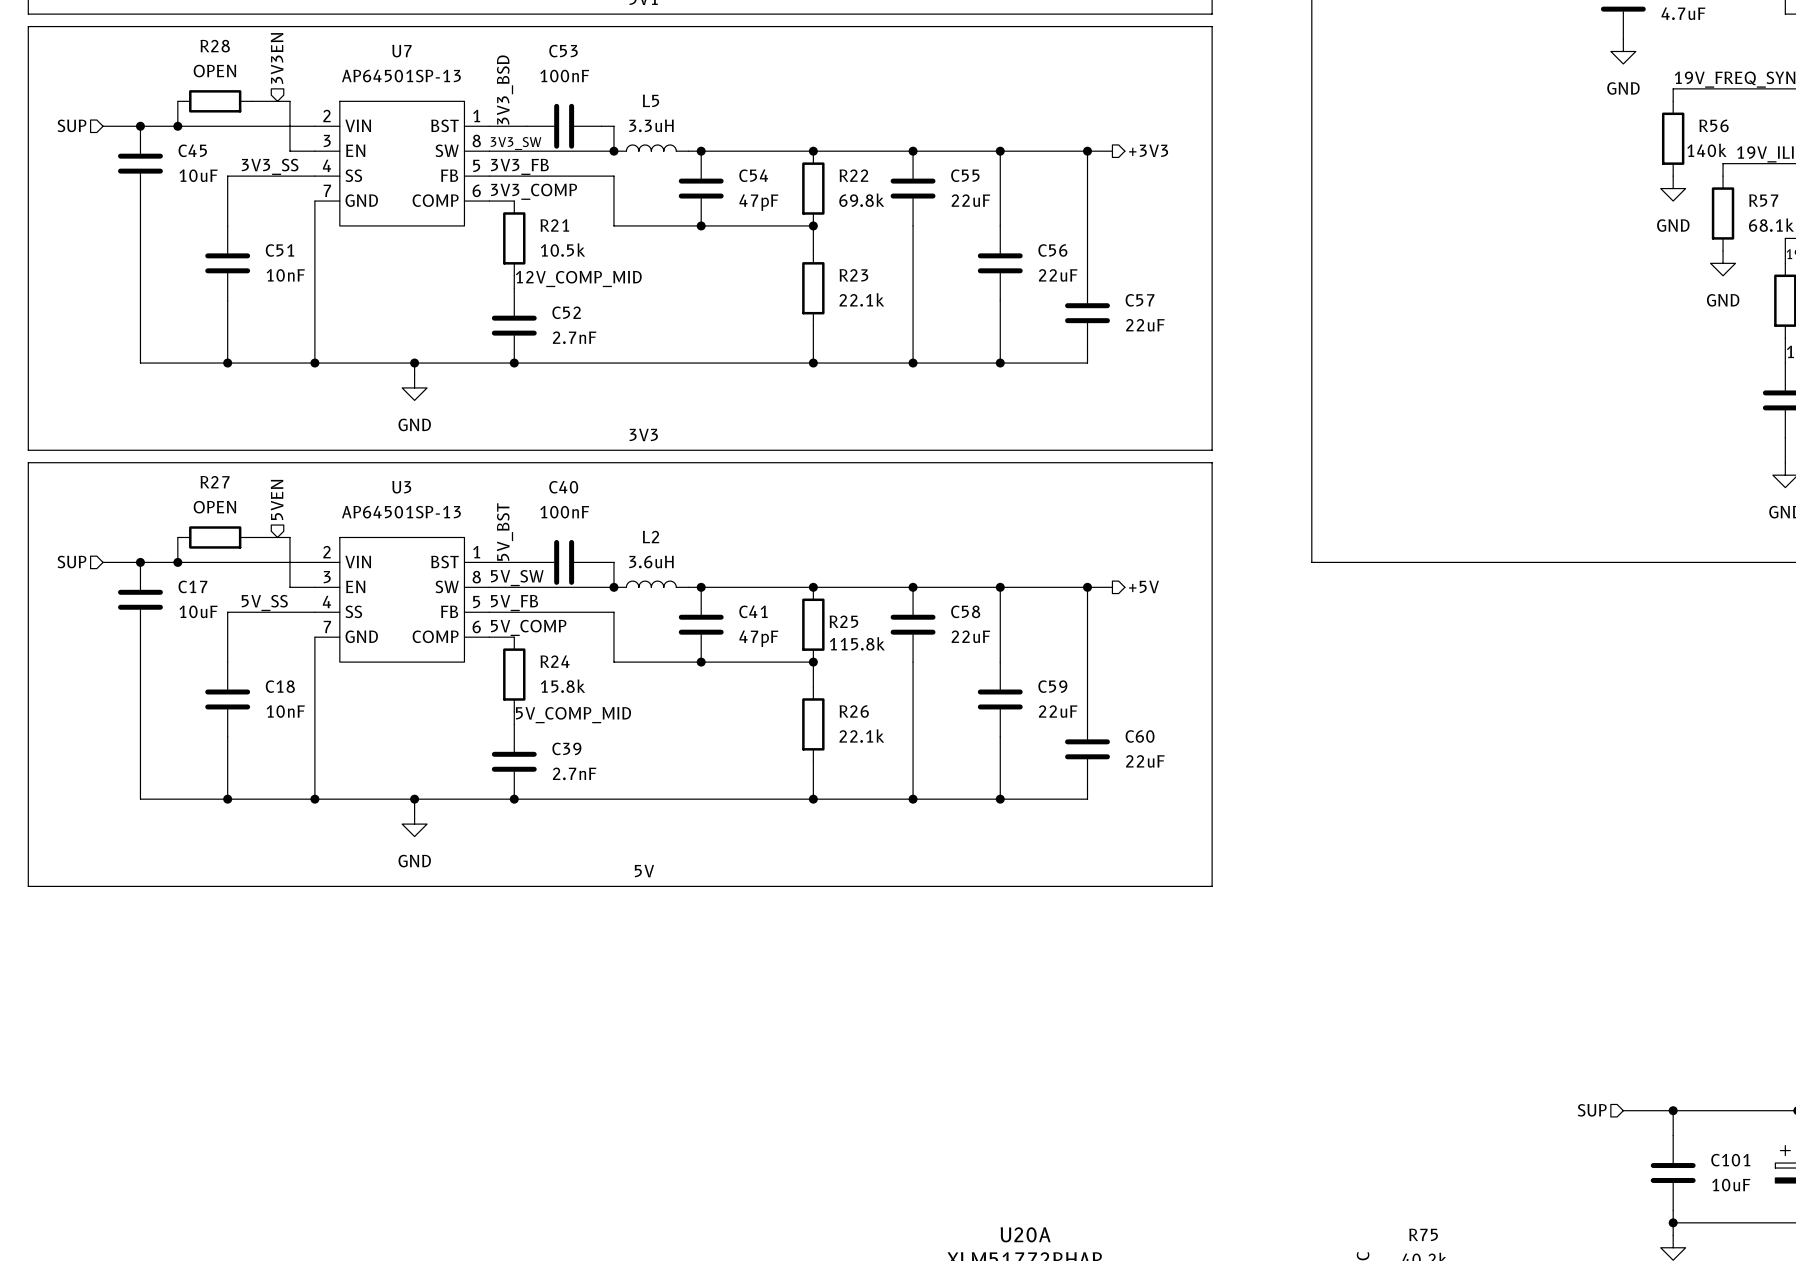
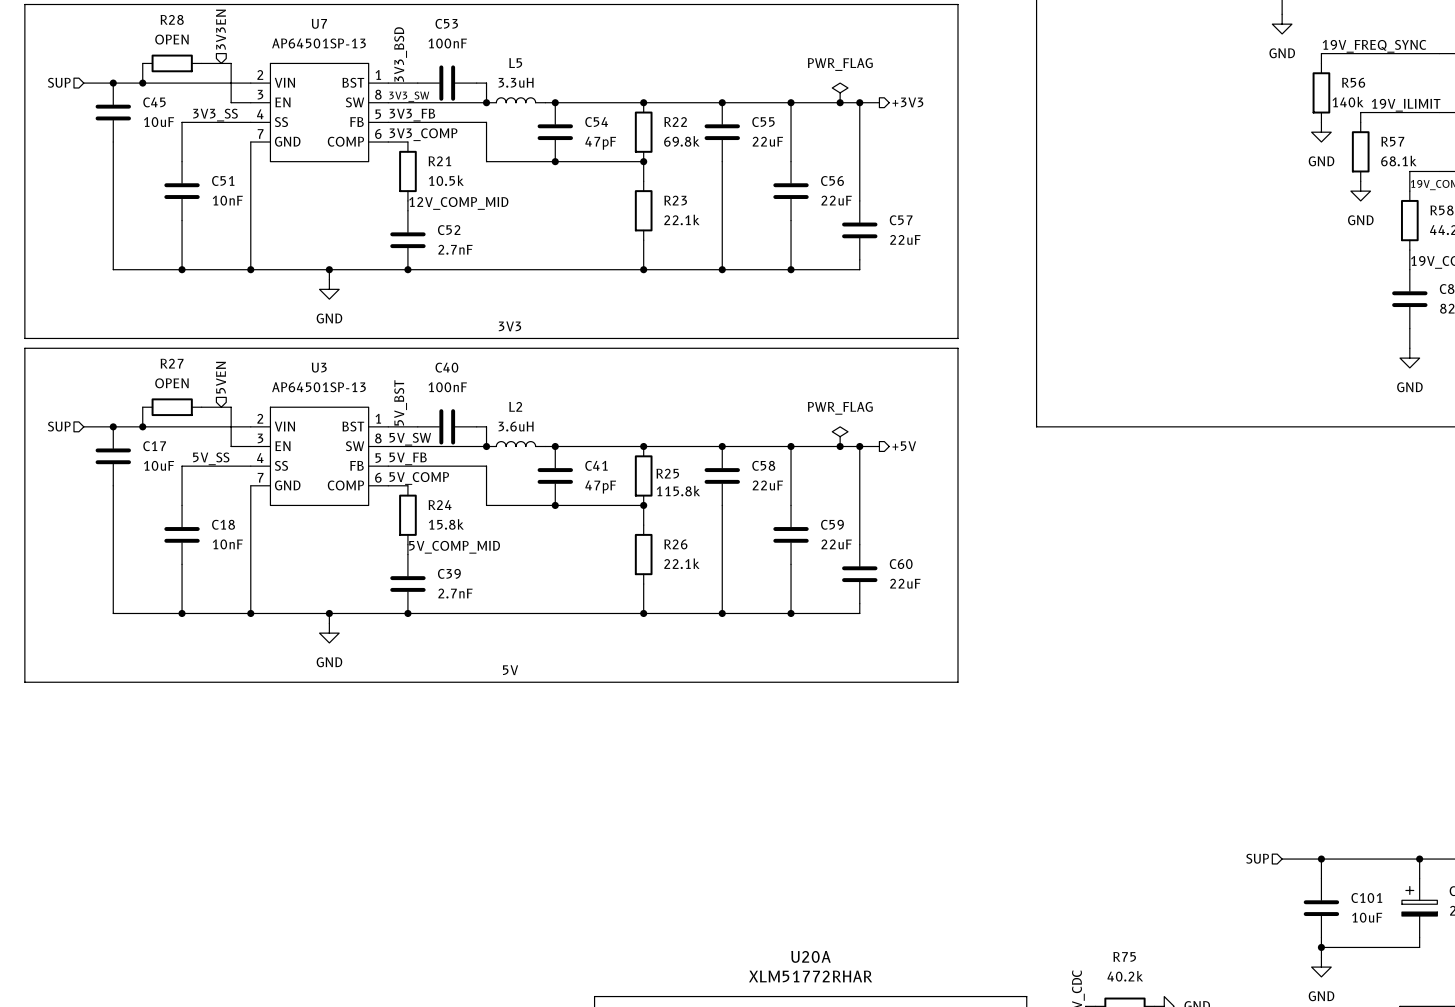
power symbol: none -> PWR_FLAG (840, 92)
junction: none -> (840, 102)
power symbol: none -> PWR_FLAG (840, 436)
junction: none -> (840, 446)

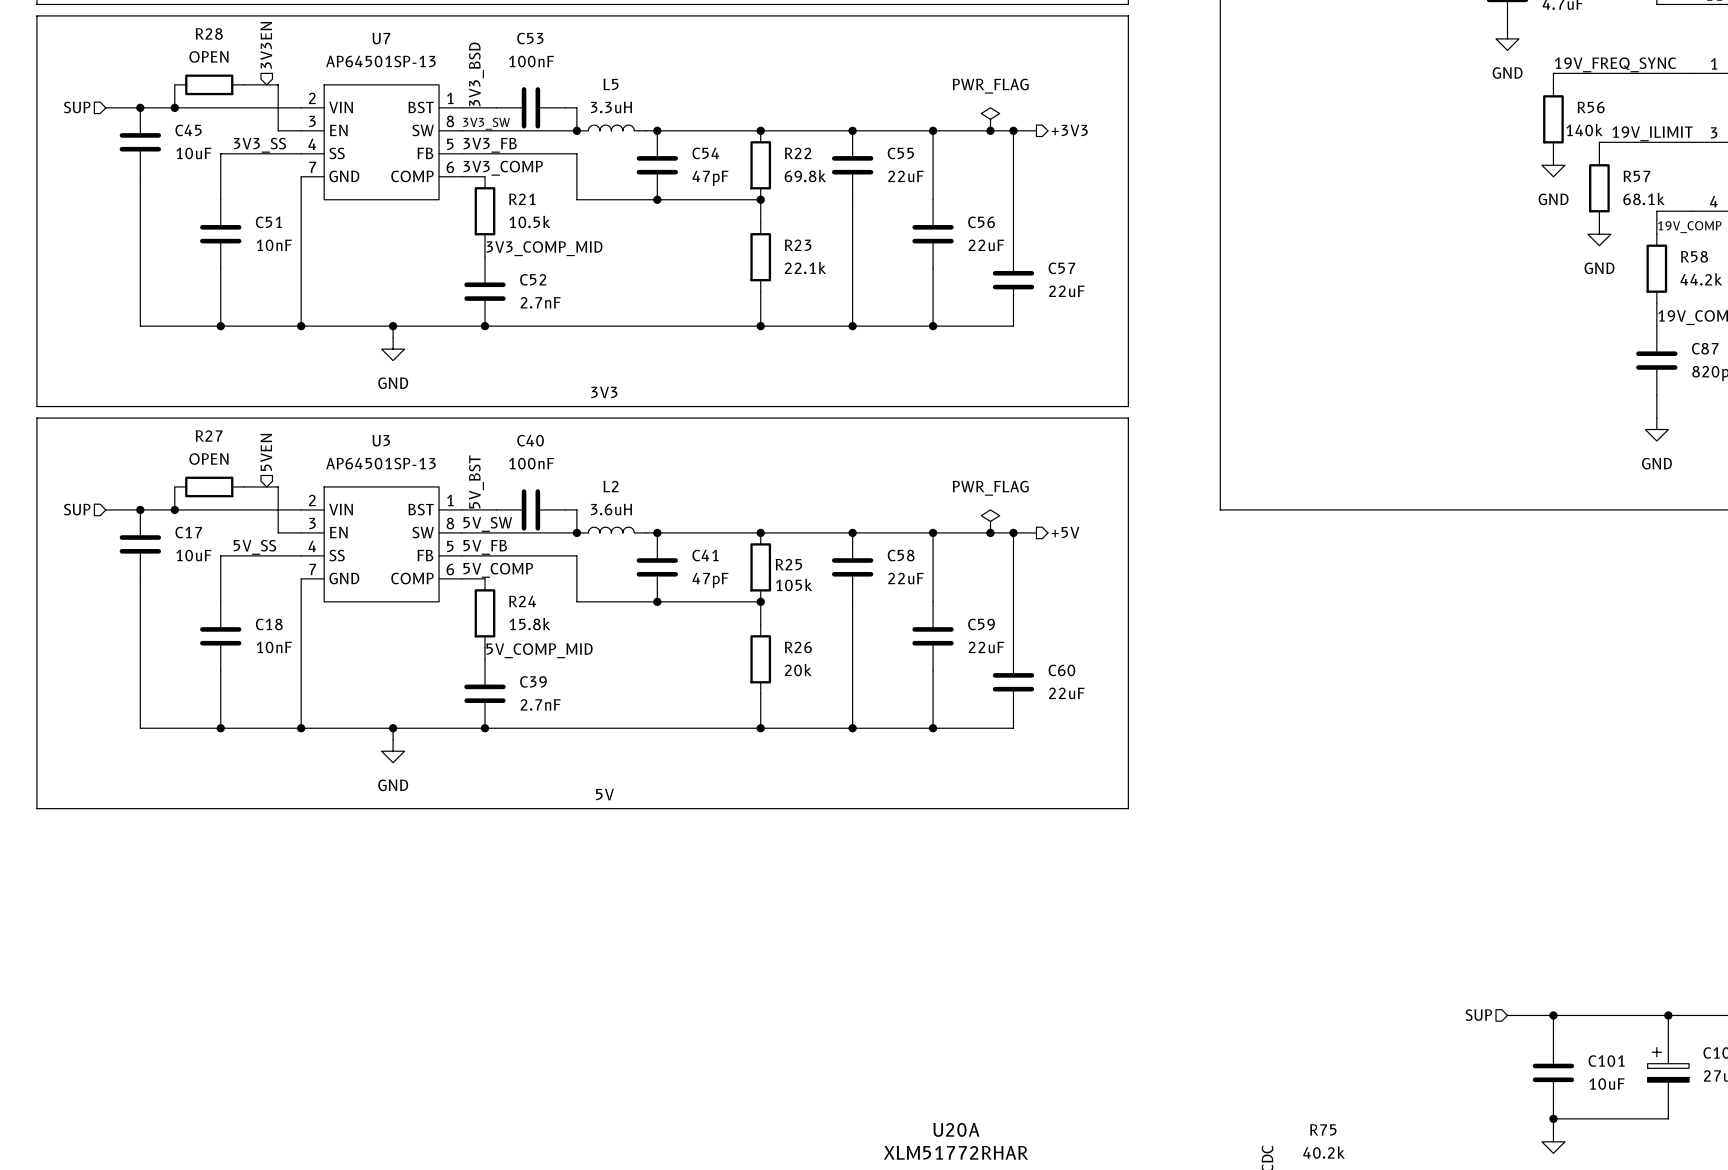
label: 12V_COMP_MID (458, 203) -> 3V3_COMP_MID (544, 248)
R25 value: 115.8k (678, 491) -> 105k (794, 585)
R26 value: 22.1k (681, 563) -> 20k (798, 670)

